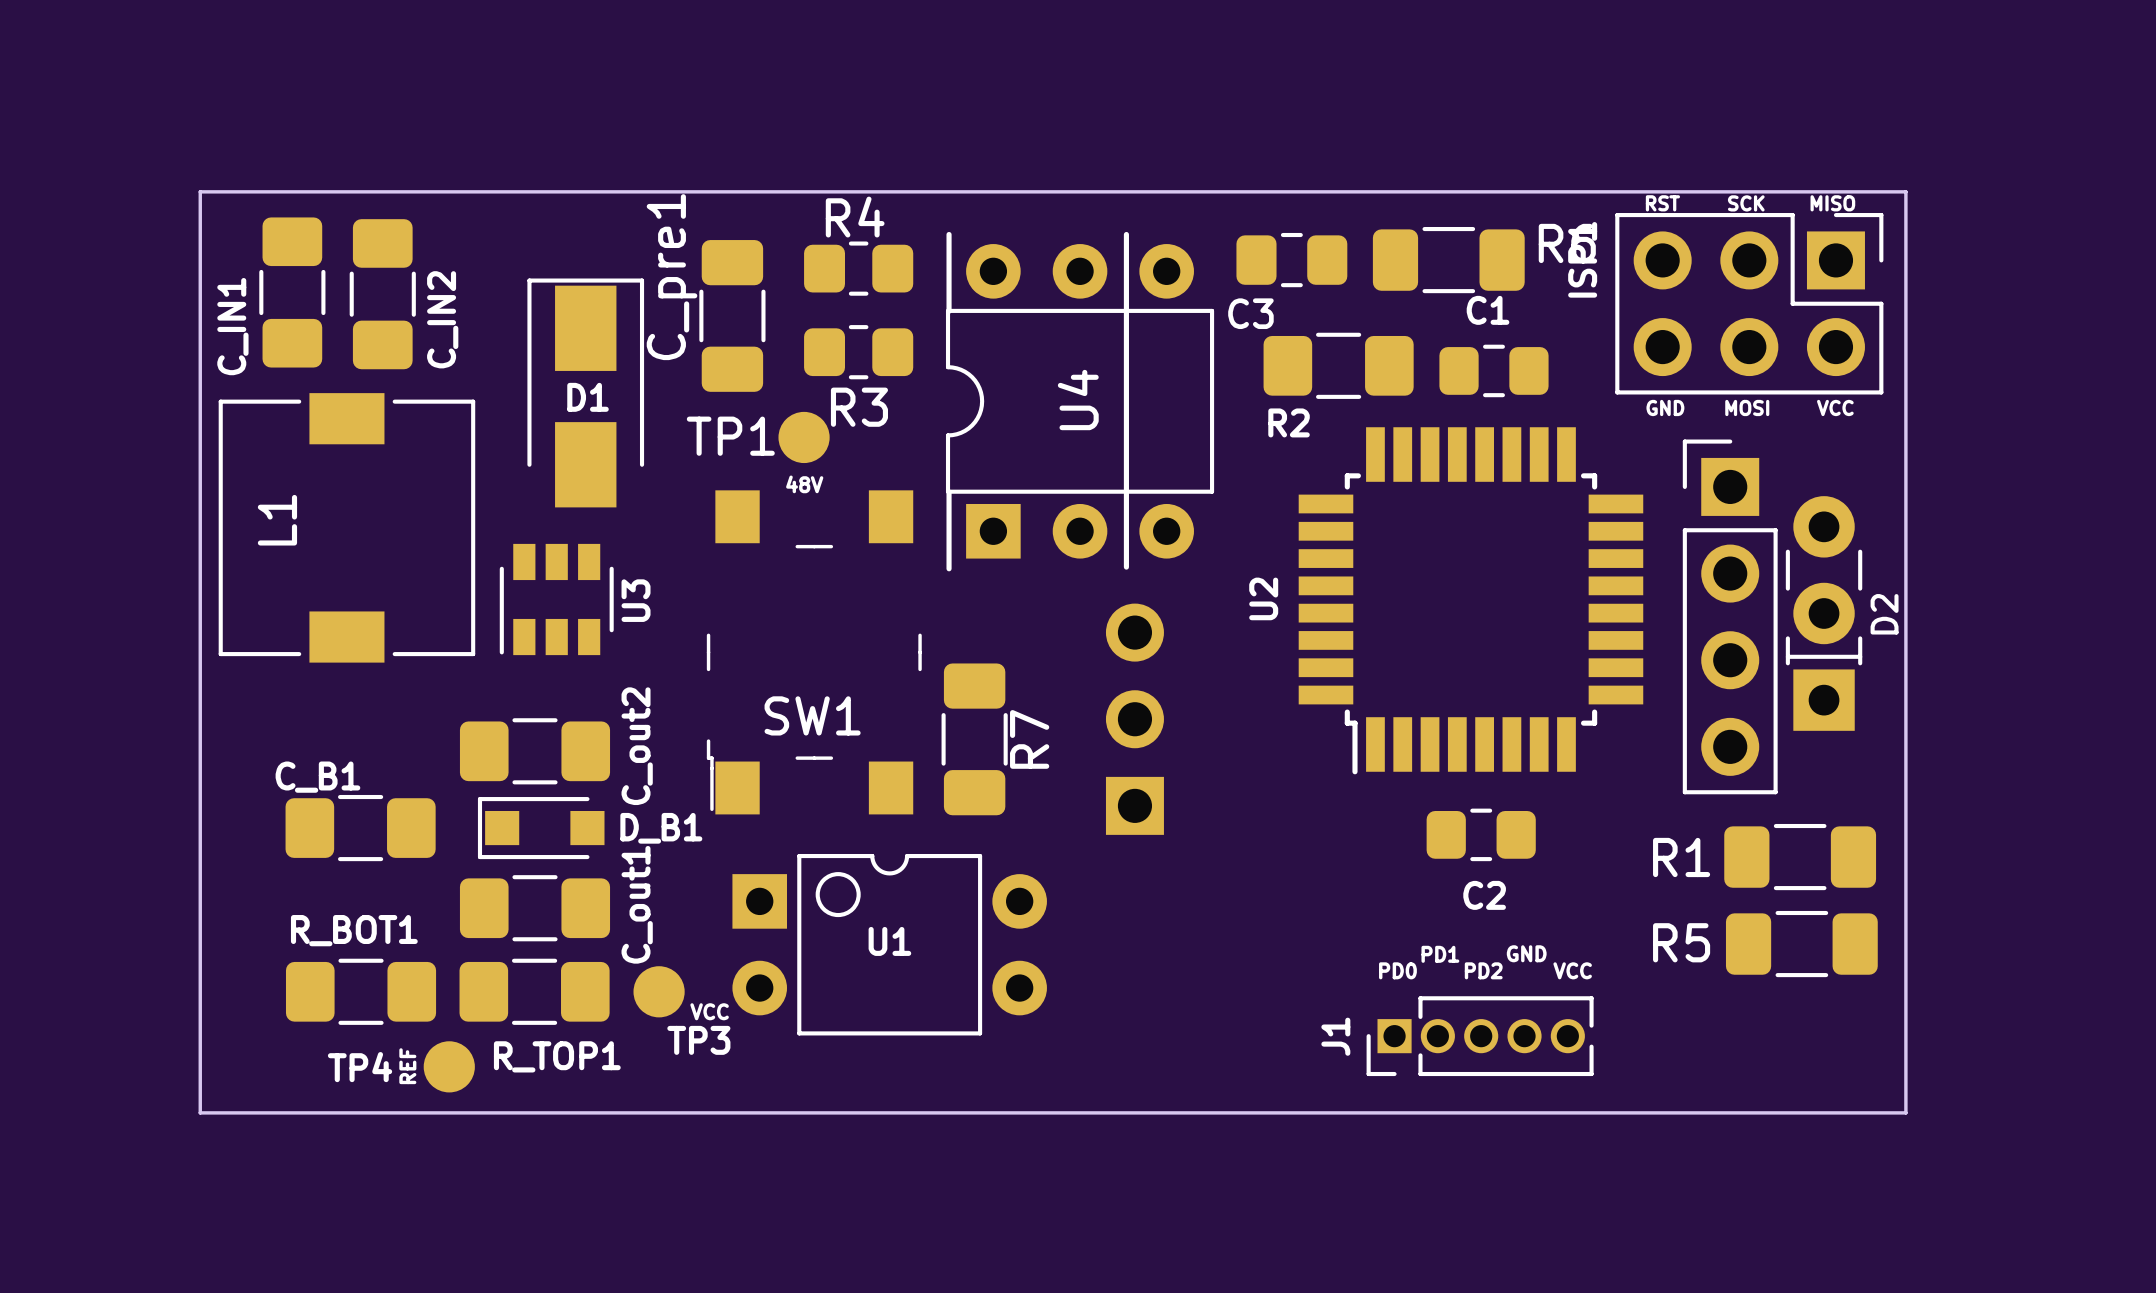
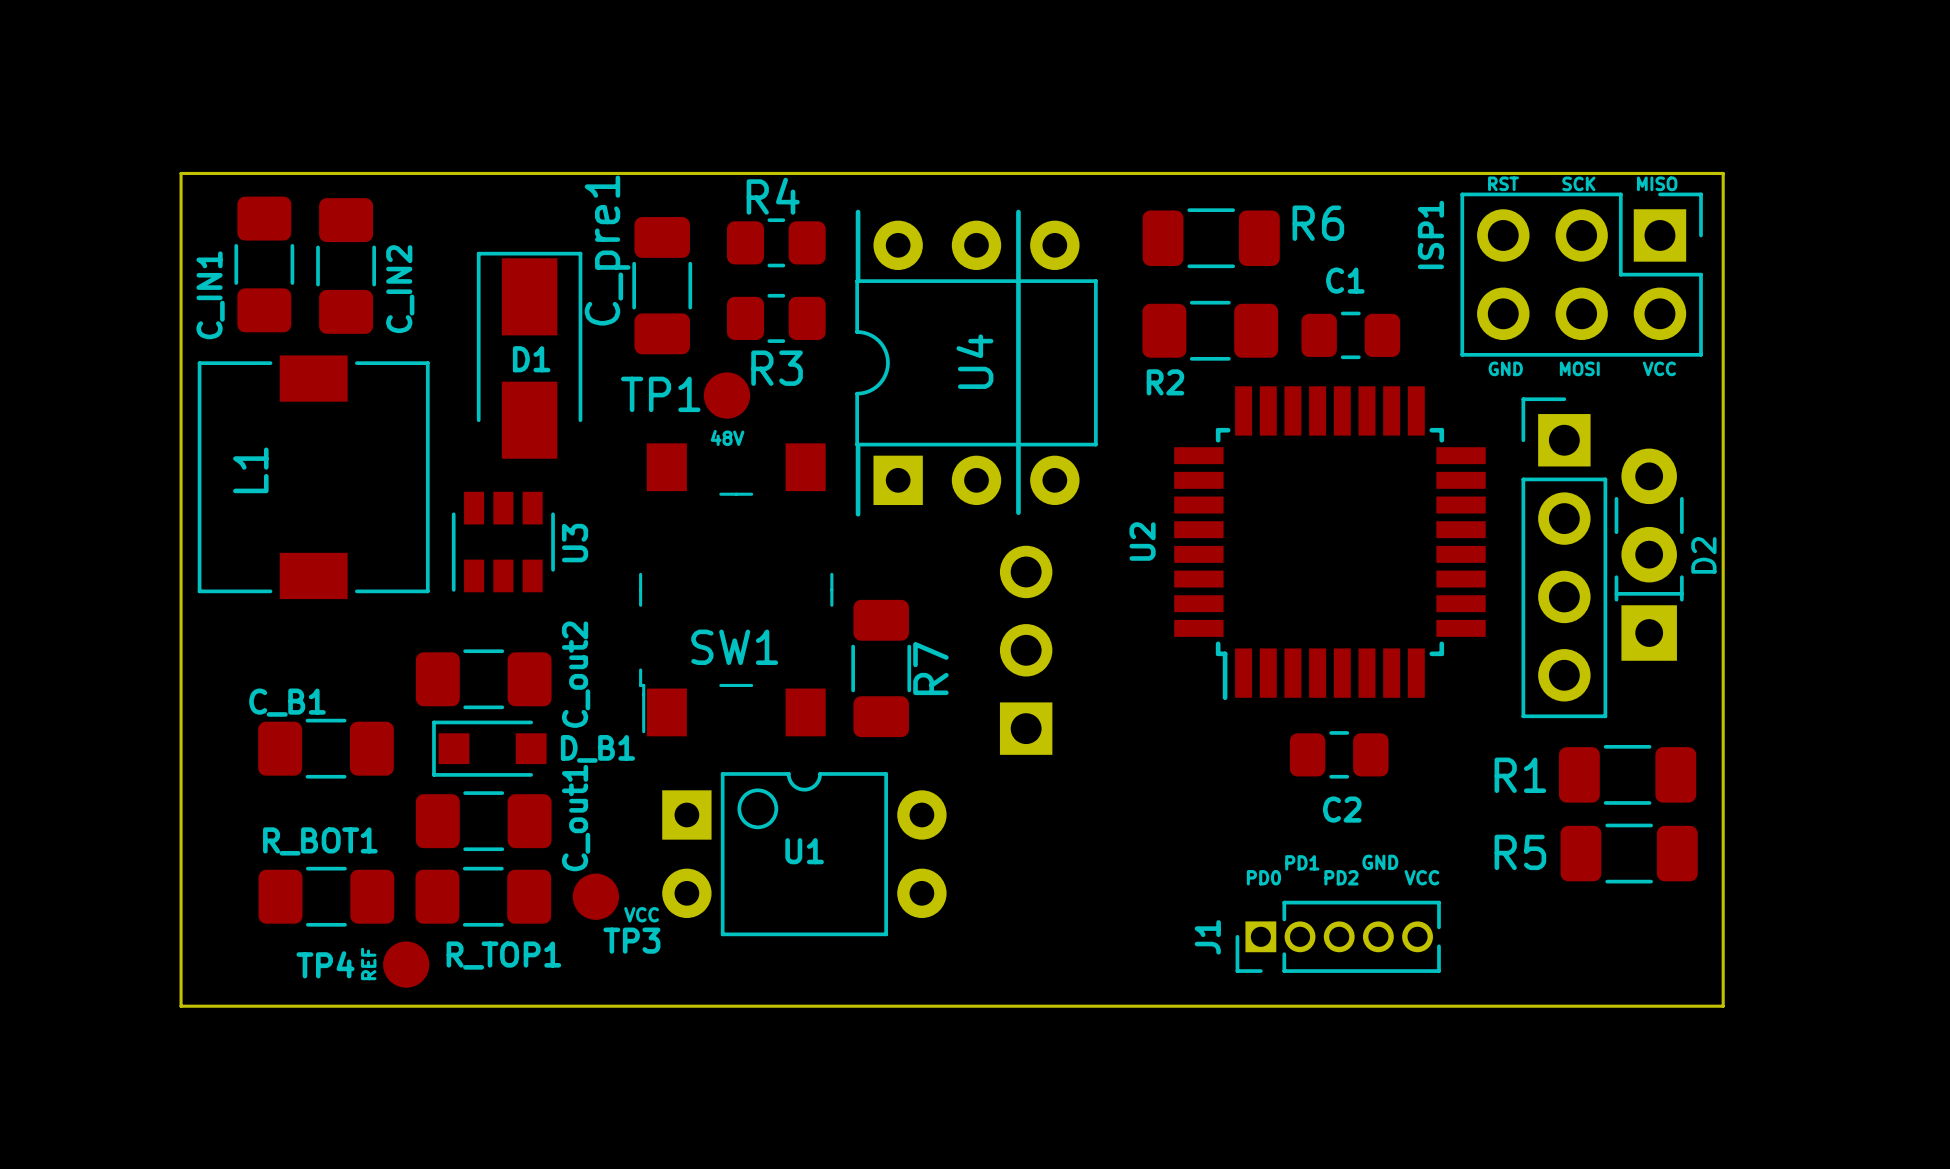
C3: (1291, 260) -> none
R6 position: (1448, 260) -> (1211, 238)

